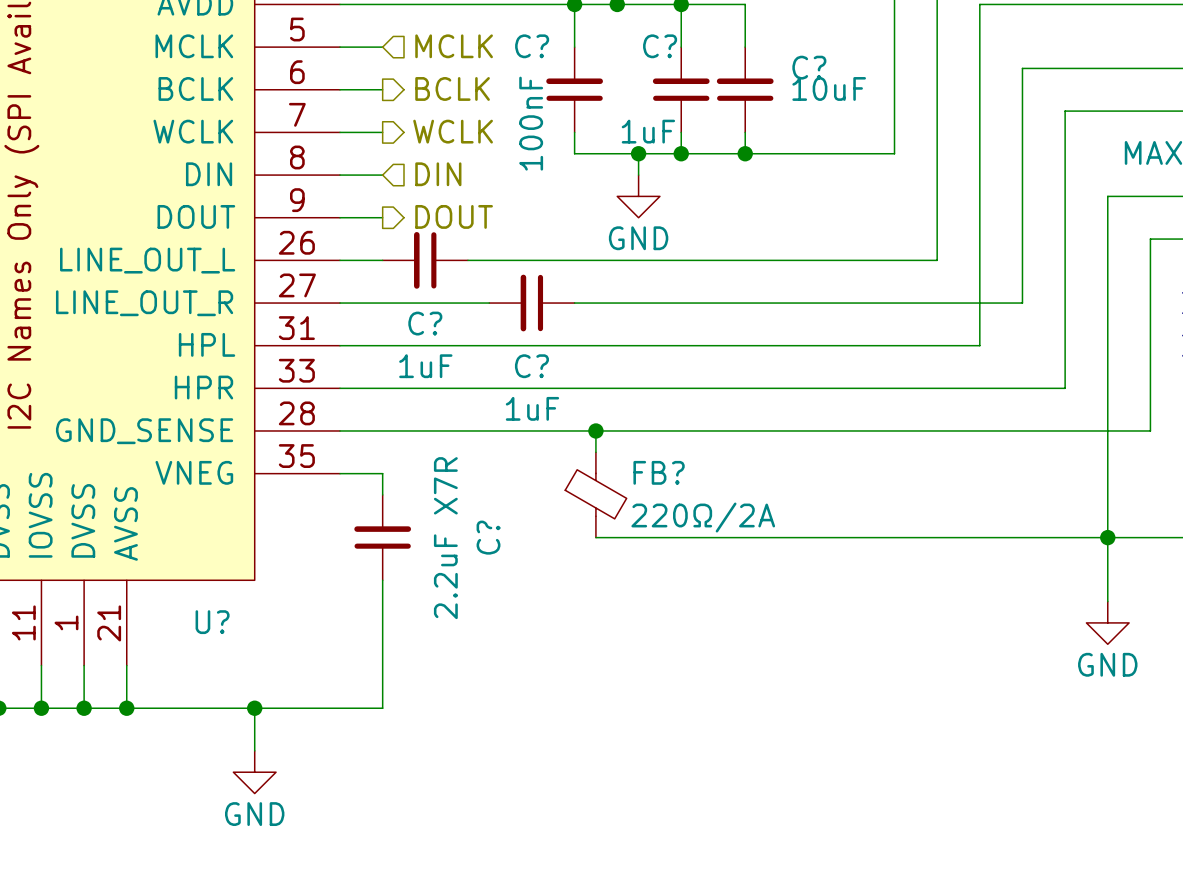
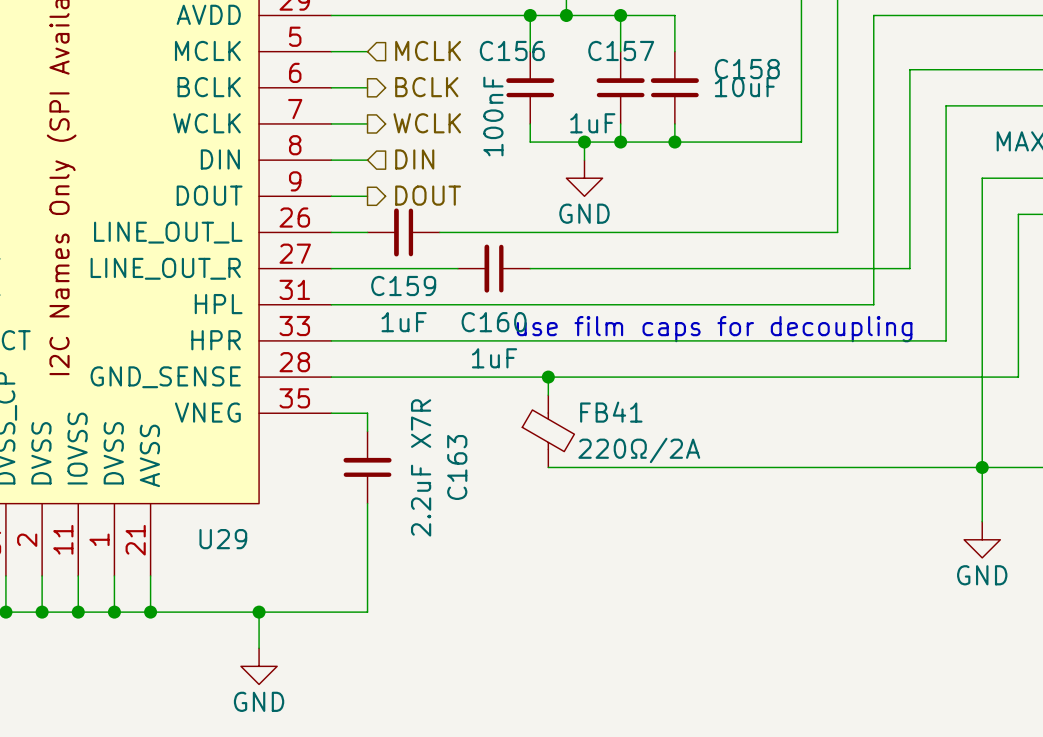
C? name: C? (532, 46) -> C156 (512, 50)
C? name: C? (660, 46) -> C157 (621, 50)
C? name: C? (809, 67) -> C158 (747, 69)
C? name: C? (425, 323) -> C159 (403, 286)
C? name: C? (531, 366) -> C160 (494, 322)
text: none -> use film caps for decoupling (714, 329)
FB? name: FB? (659, 472) -> FB41 (611, 412)
C? name: C? (488, 537) -> C163 (457, 467)
U? name: U? (212, 622) -> U29 (223, 539)

